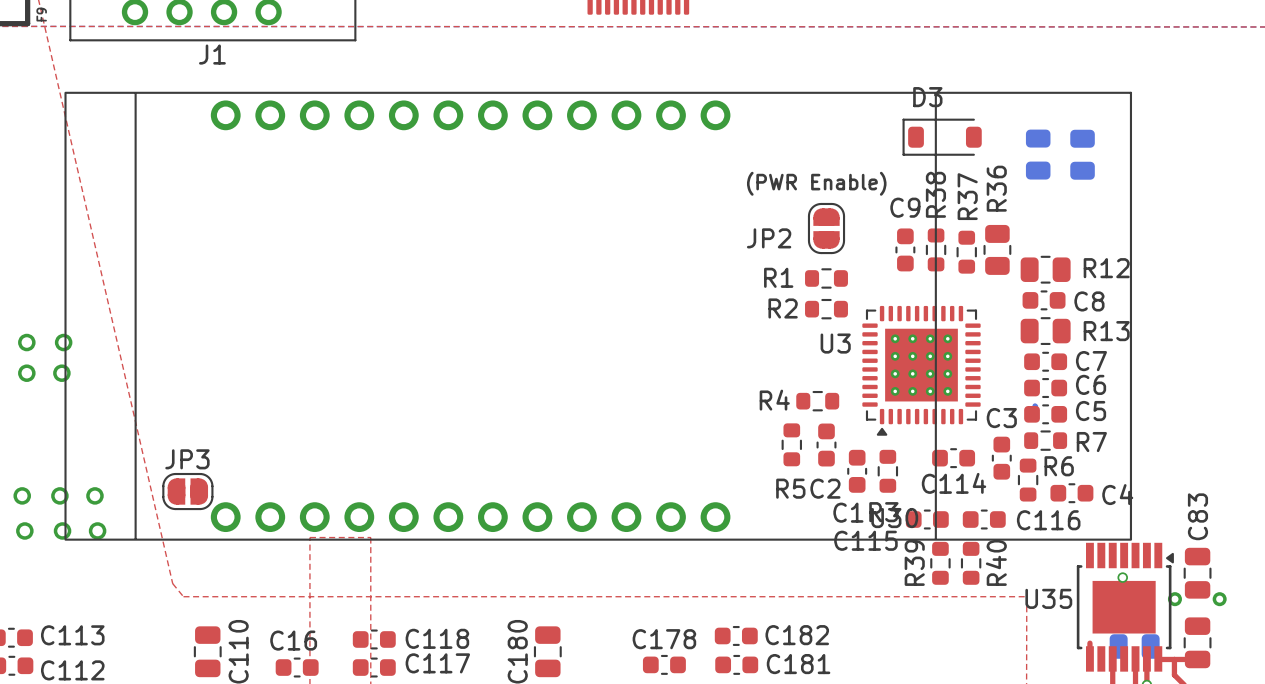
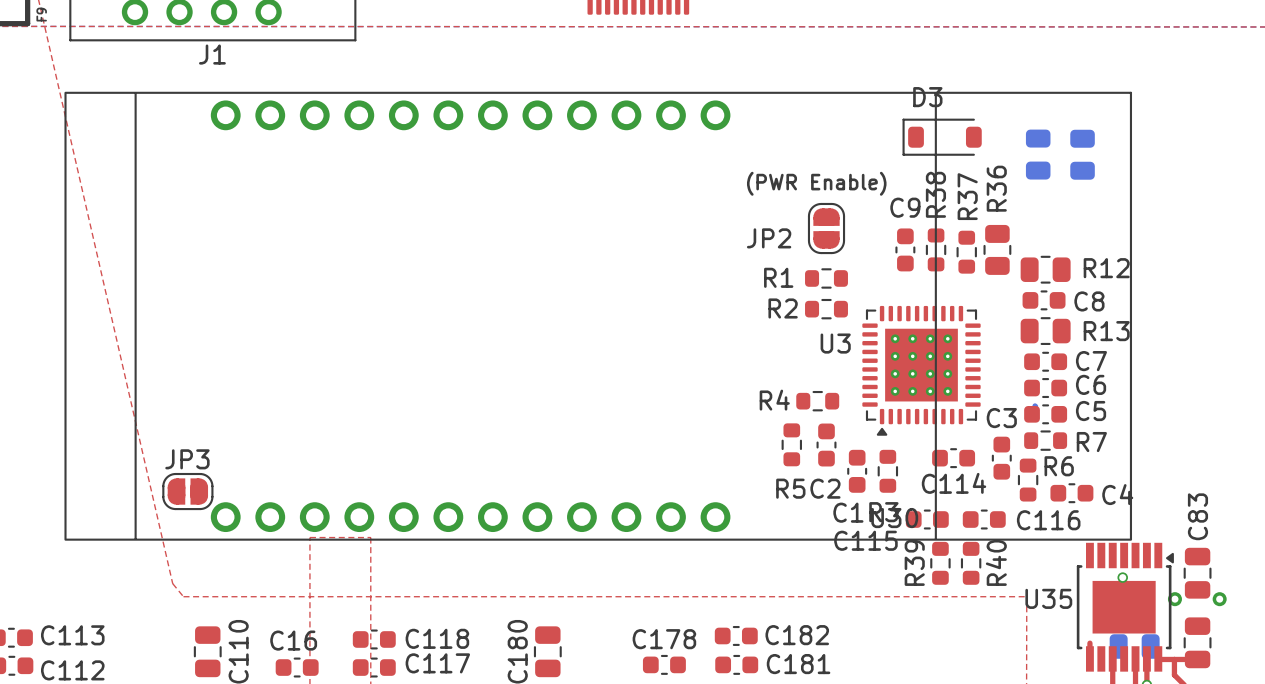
via: (26, 342) -> none
via: (63, 342) -> none
via: (26, 373) -> none
via: (61, 373) -> none
via: (22, 495) -> none
via: (59, 495) -> none
via: (94, 495) -> none
via: (24, 530) -> none
via: (62, 530) -> none
via: (97, 530) -> none

